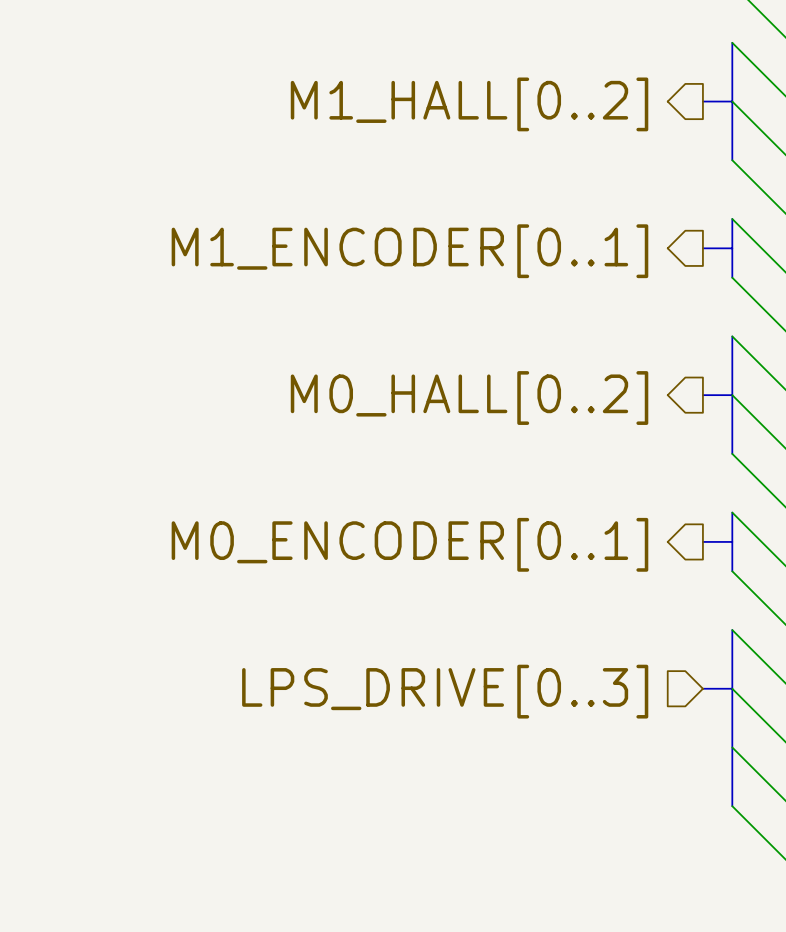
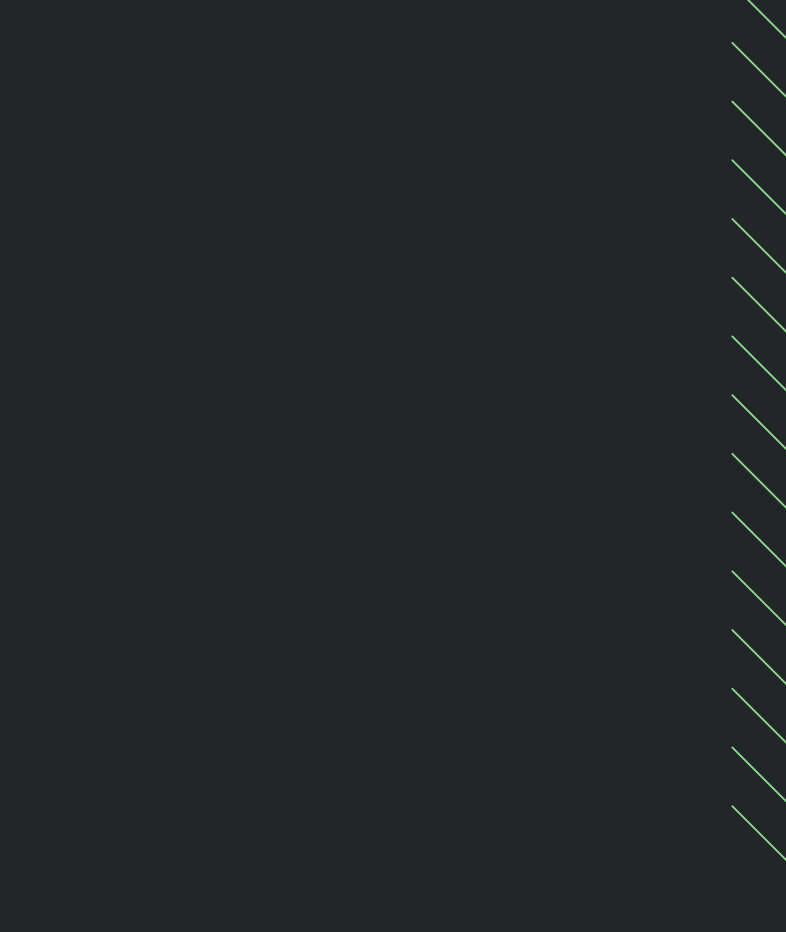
bus: (732, 42) (732, 160) -> none
bus: (702, 101) (732, 101) -> none
hierarchical label: M1_HALL[0..2] (469, 104) -> none
bus: (732, 218) (732, 277) -> none
bus: (702, 248) (732, 248) -> none
hierarchical label: M1_ENCODER[0..1] (409, 251) -> none
bus: (732, 336) (732, 453) -> none
bus: (702, 395) (732, 395) -> none
hierarchical label: M0_HALL[0..2] (469, 398) -> none
bus: (732, 512) (732, 571) -> none
bus: (702, 541) (732, 541) -> none
hierarchical label: M0_ENCODER[0..1] (409, 544) -> none
bus: (732, 630) (732, 806) -> none
bus: (702, 688) (732, 688) -> none
hierarchical label: LPS_DRIVE[0..3] (445, 691) -> none

